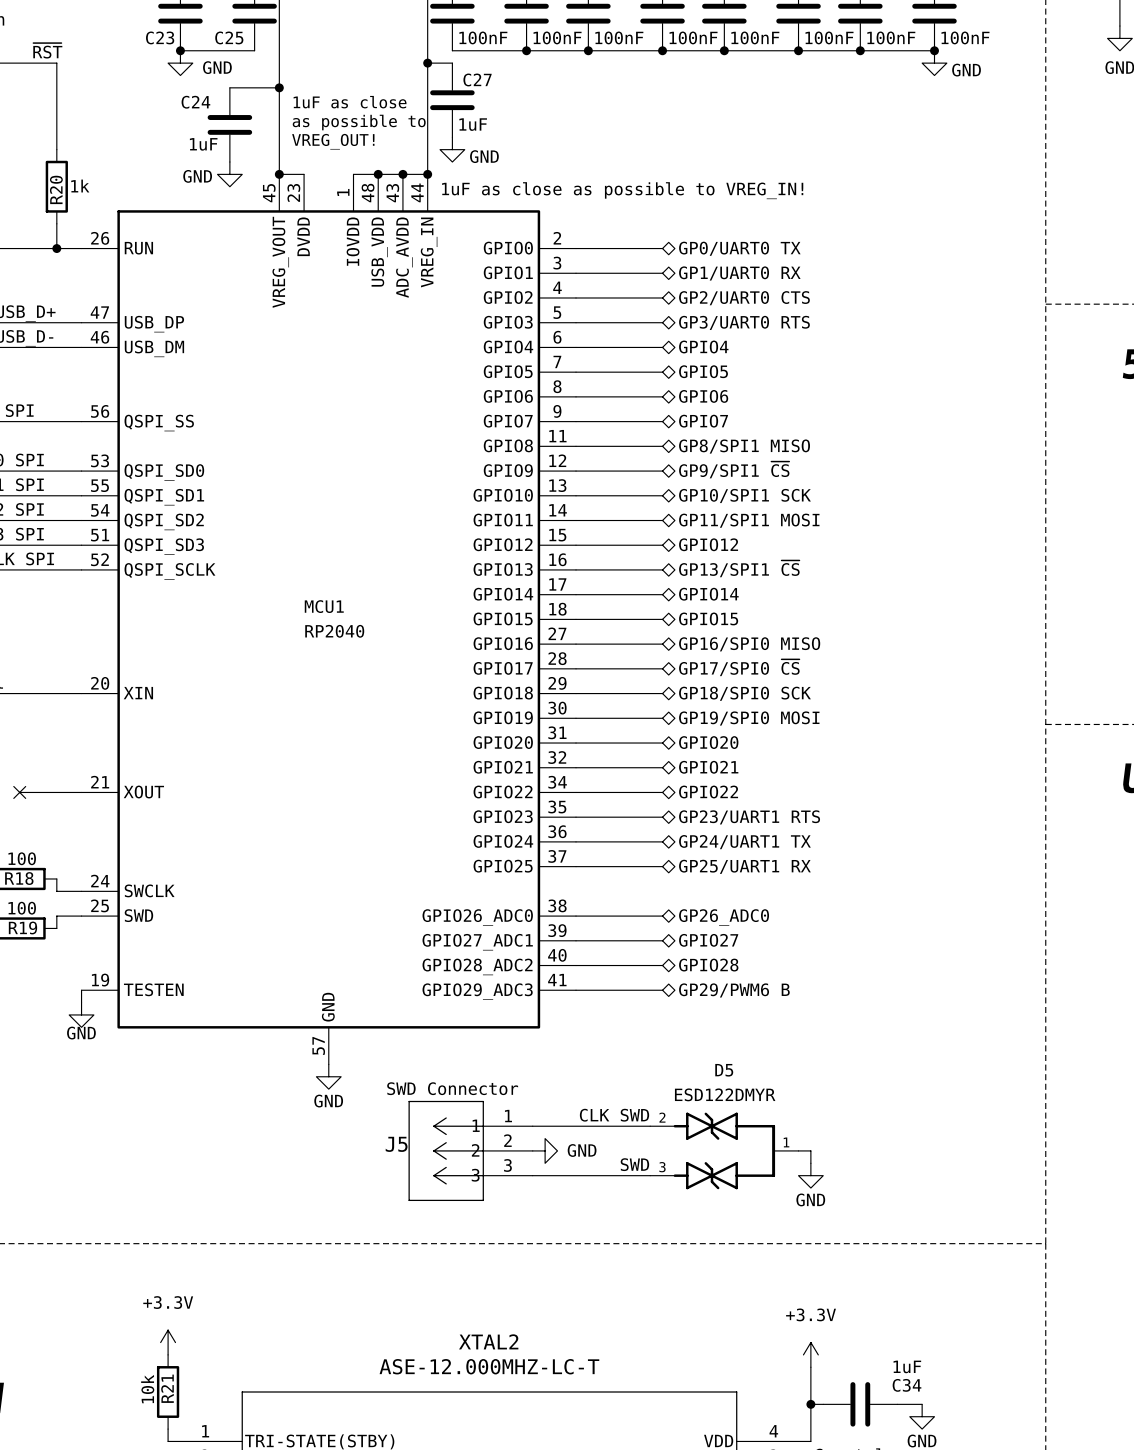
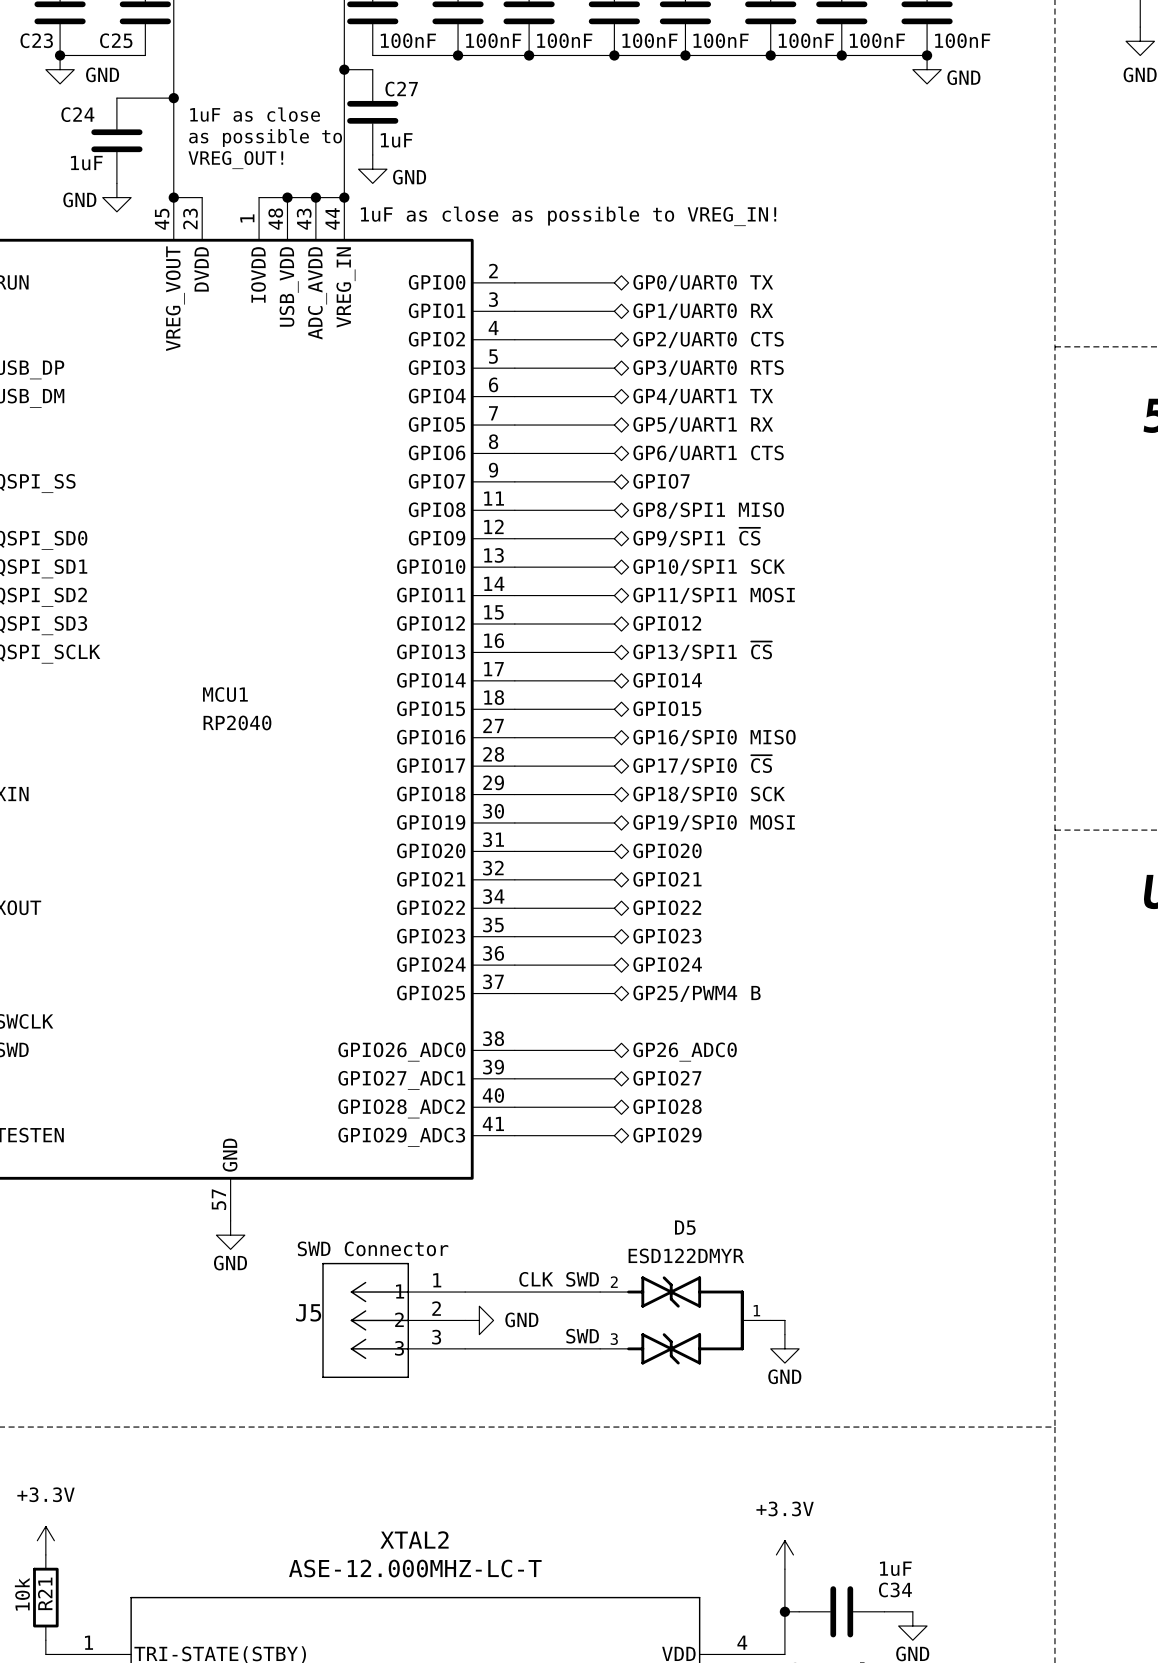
hierarchical label: GPIO4 (703, 346) -> GP4/UART1 TX (703, 396)
hierarchical label: GPIO5 (703, 371) -> GP5/UART1 RX (703, 425)
hierarchical label: GPIO6 (703, 396) -> GP6/UART1 CTS (708, 453)
hierarchical label: GP23/UART1 RTS (749, 817) -> GPIO23 (667, 936)
hierarchical label: GP24/UART1 TX (744, 842) -> GPIO24 (667, 964)
hierarchical label: GP25/UART1 RX (744, 866) -> GP25/PWM4 B (697, 993)
hierarchical label: GP29/PWM6 B (734, 990) -> GPIO29 (667, 1135)

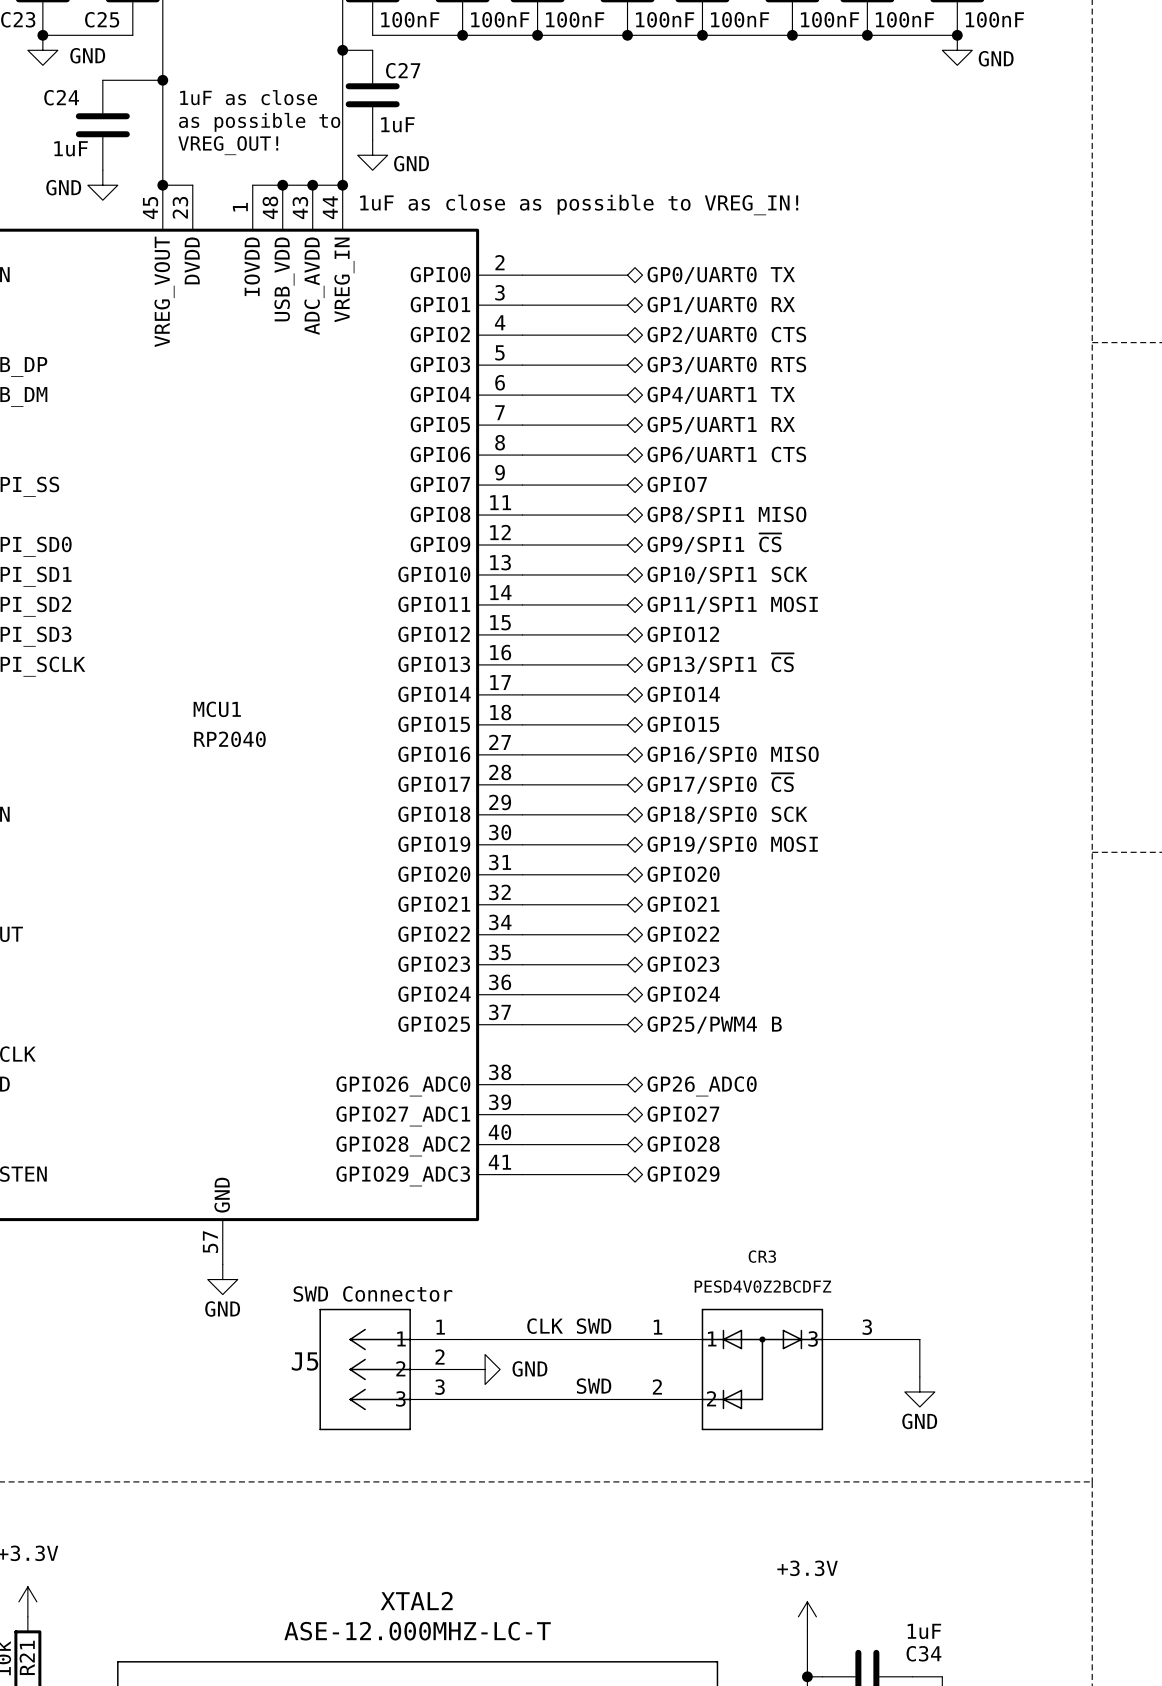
wire: none -> (912, 1339) (919, 1339) (919, 1376)
D5: ESD122DMYR (685, 1320) -> none
CR3: none -> PESD4V0Z2BCDFZ (762, 1369)
wire: (770, 1320) (784, 1320) (784, 1334) -> none
power symbol position: GND (784, 1348) -> GND (919, 1391)

